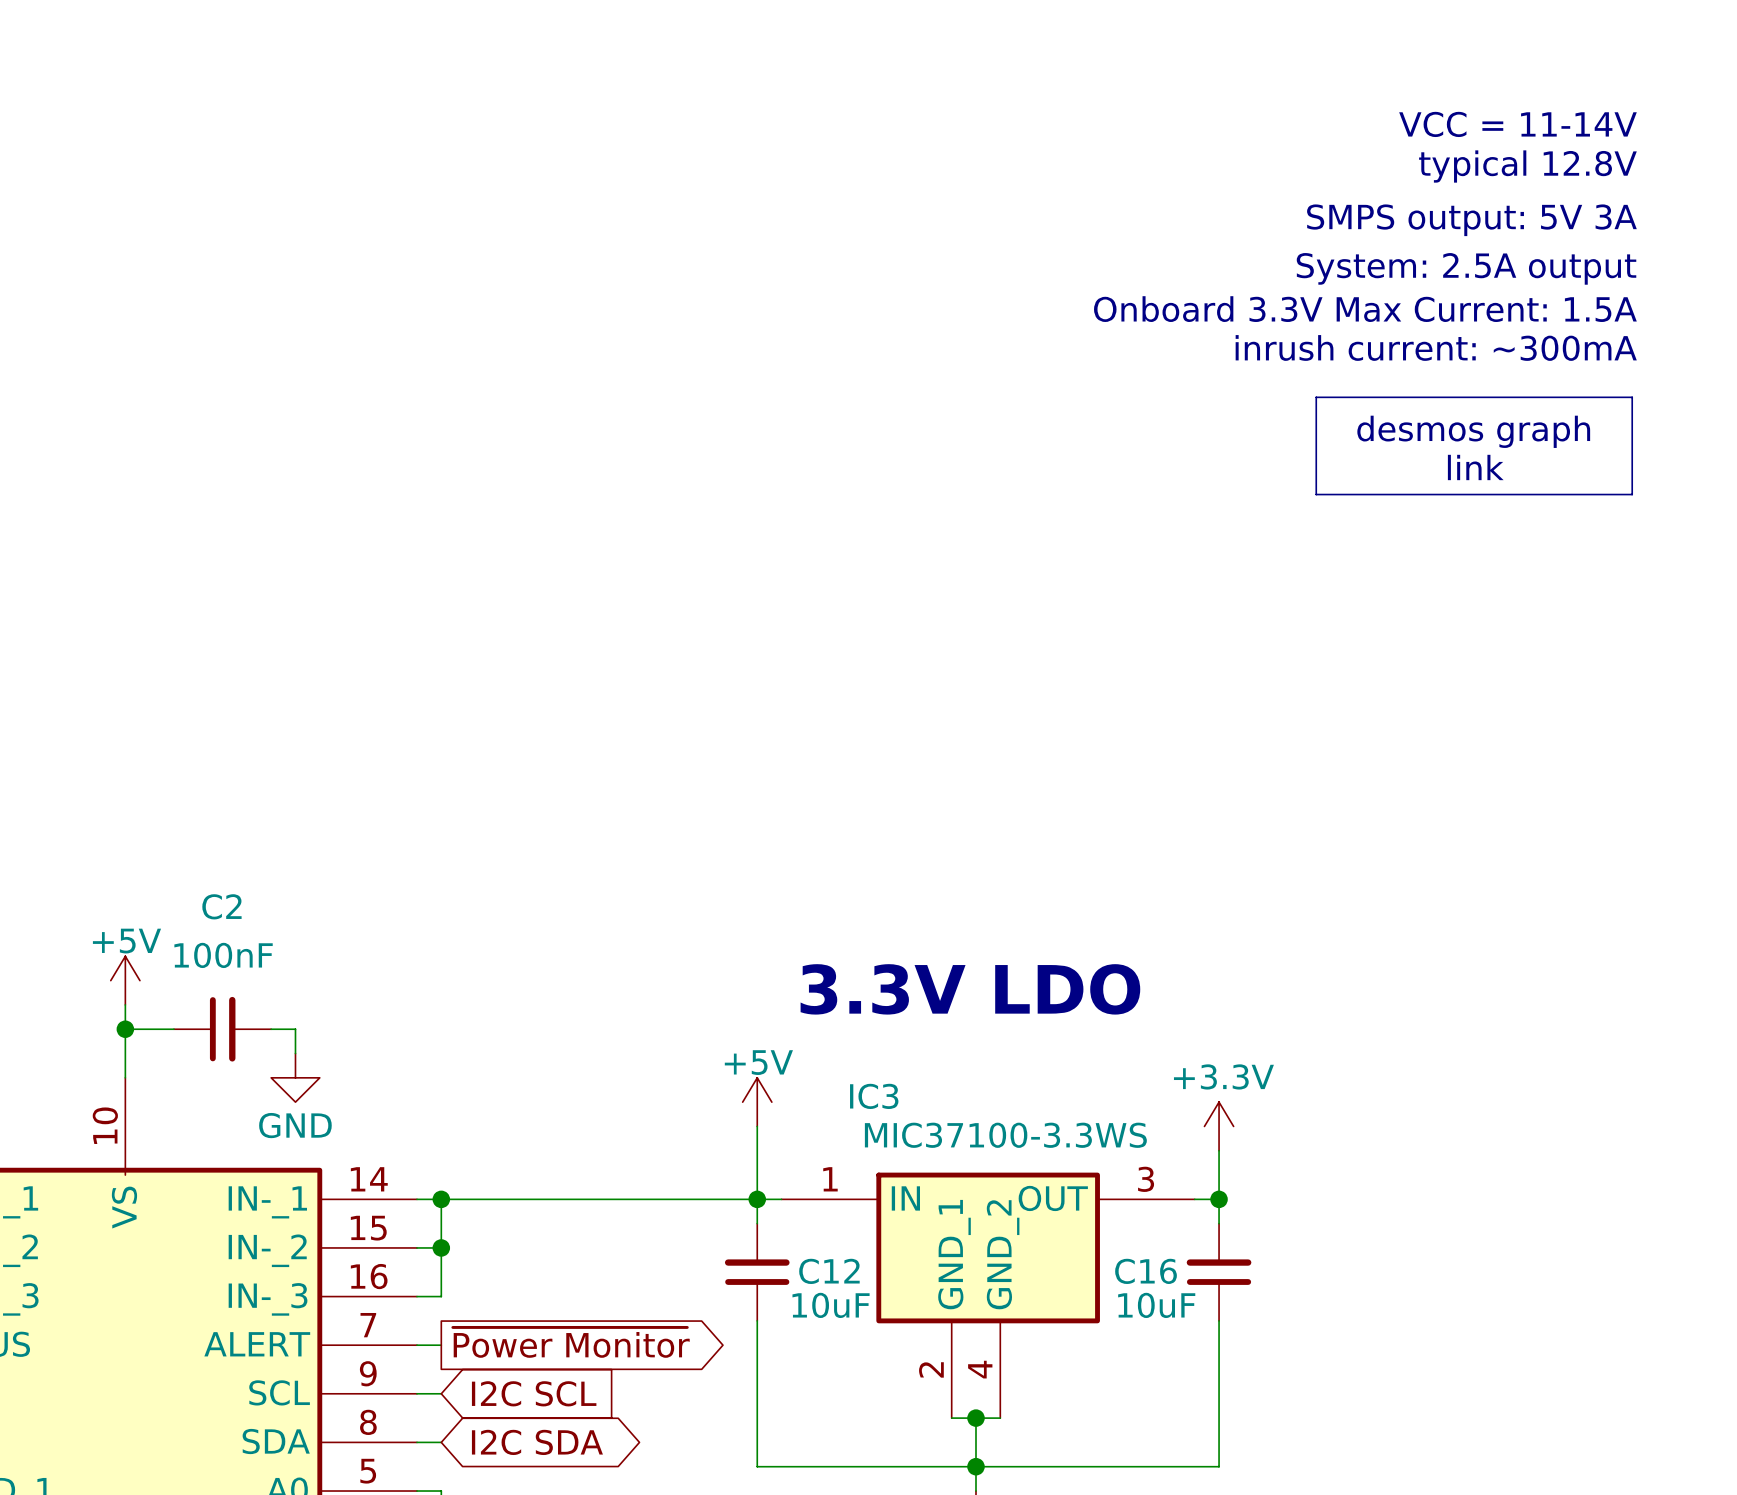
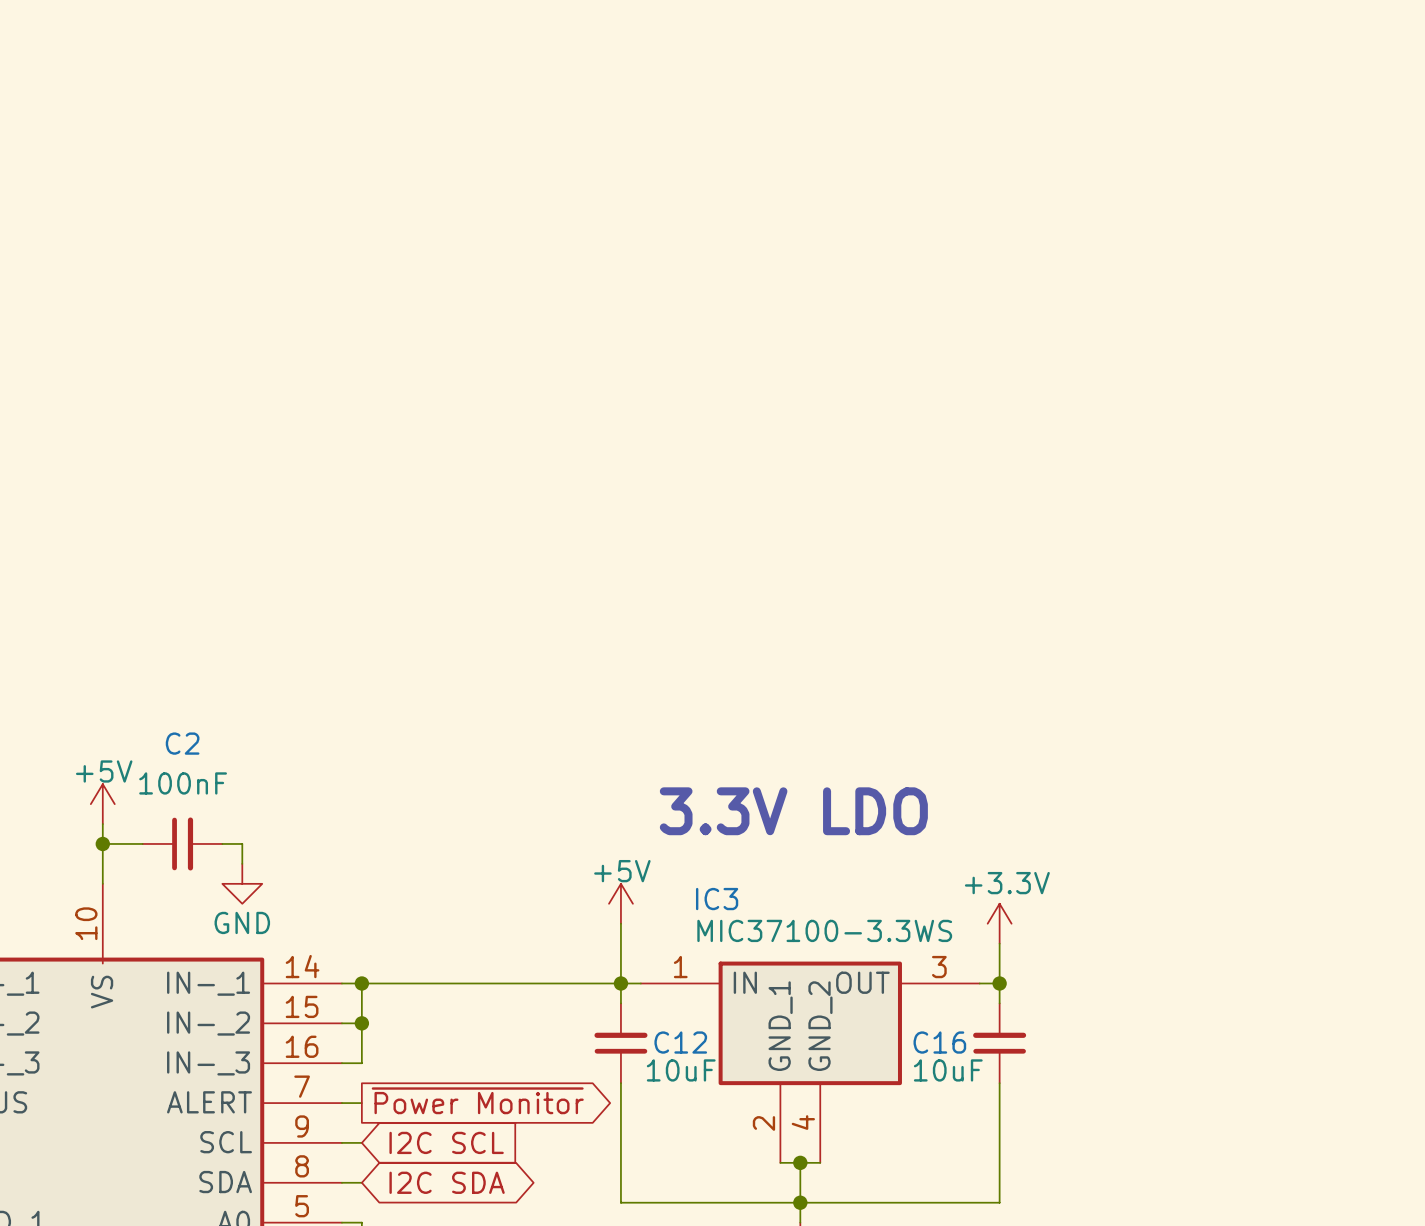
text: VCC = 11-14V (1517, 124) -> none
text: typical 12.8V (1527, 166) -> none
text: SMPS output: 5V 3A (1471, 220) -> none
text: System: 2.5A output (1466, 268) -> none
text: Onboard 3.3V Max Current: 1.5A (1365, 309) -> none
text: inrush current: ~300mA (1436, 347) -> none
line: (1316, 397) (1632, 397) (1632, 494) (1316, 494) (1316, 397) -> none
text: desmos graph (1473, 431) -> none
text: link (1475, 467) -> none

